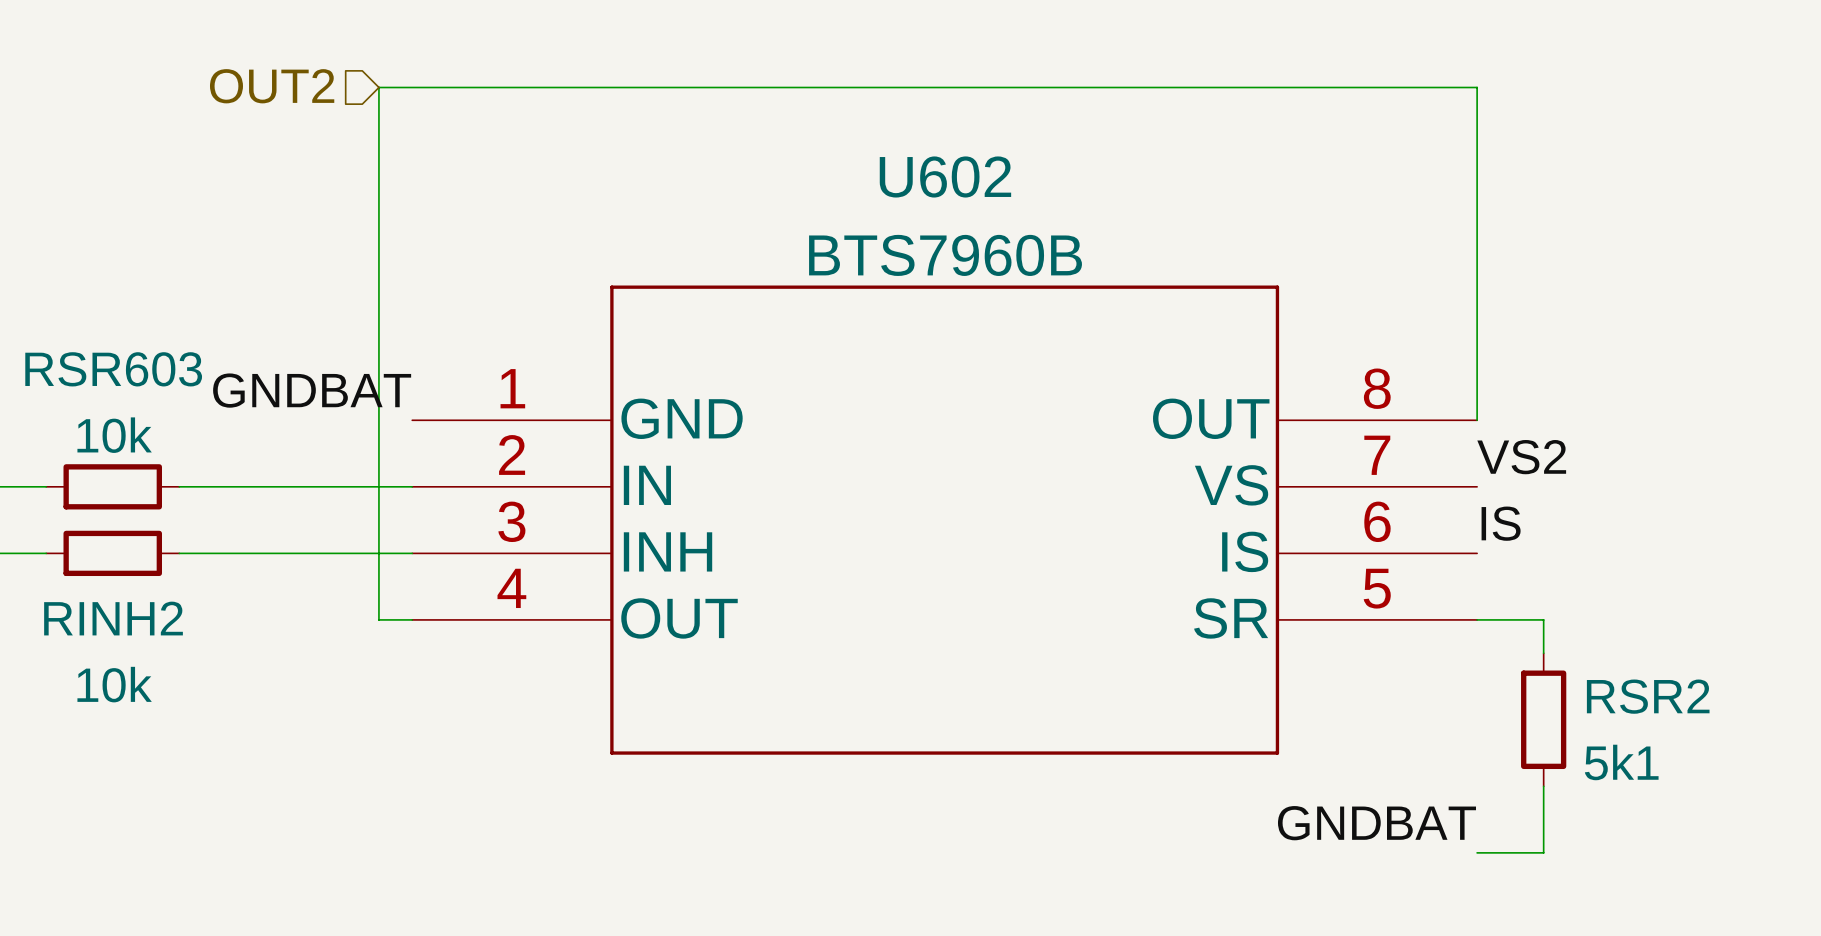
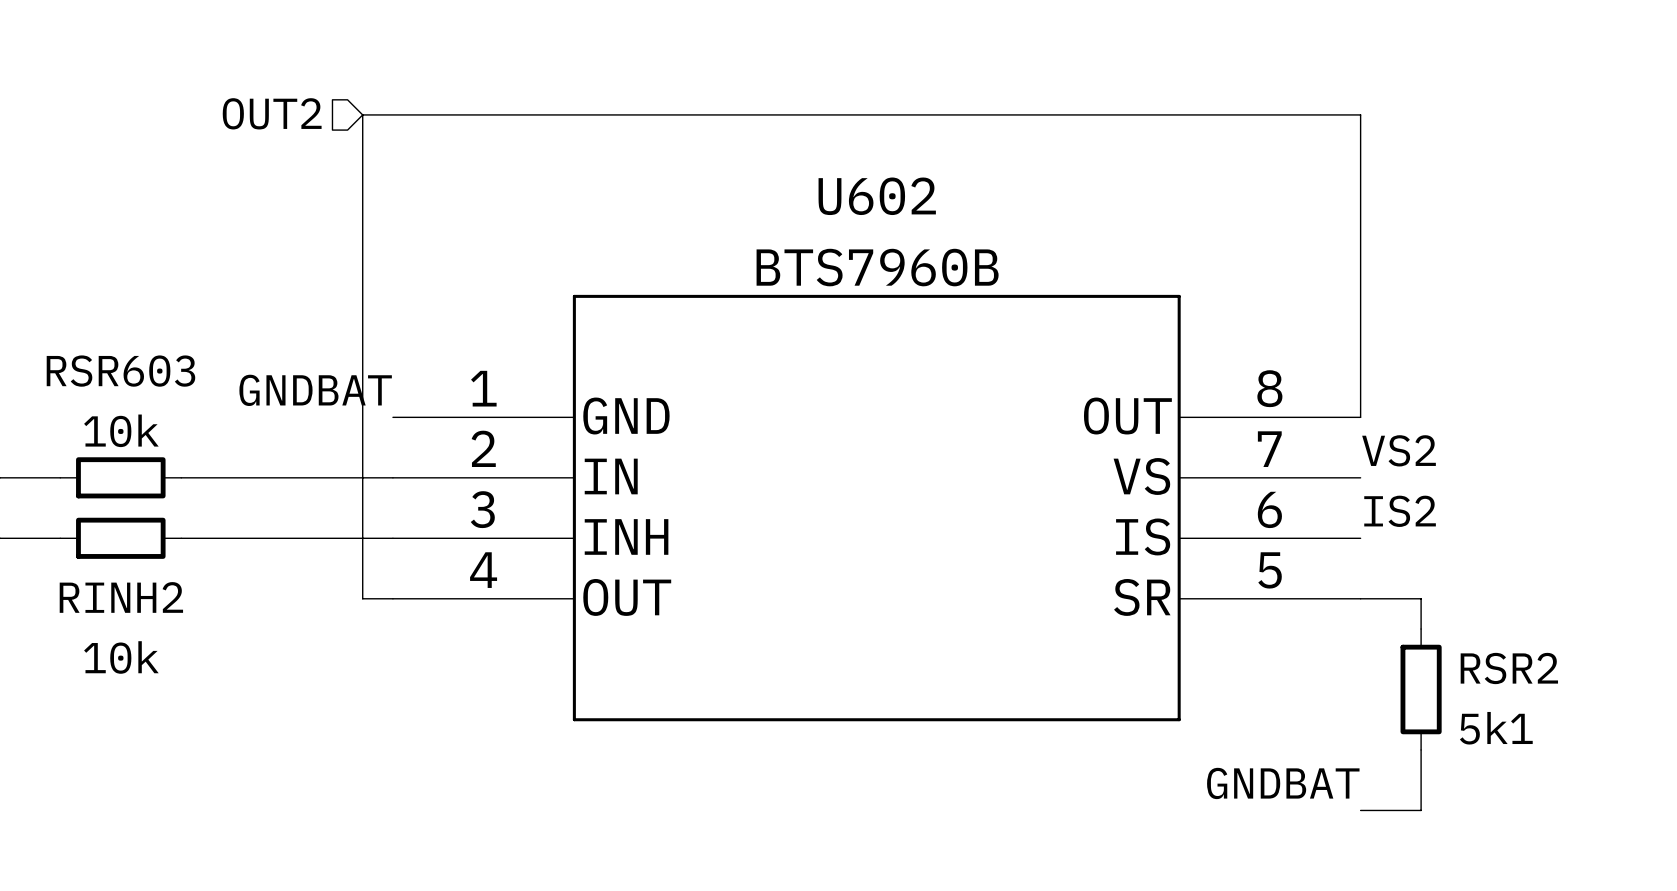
label: IS (1501, 523) -> IS2 (1400, 511)

